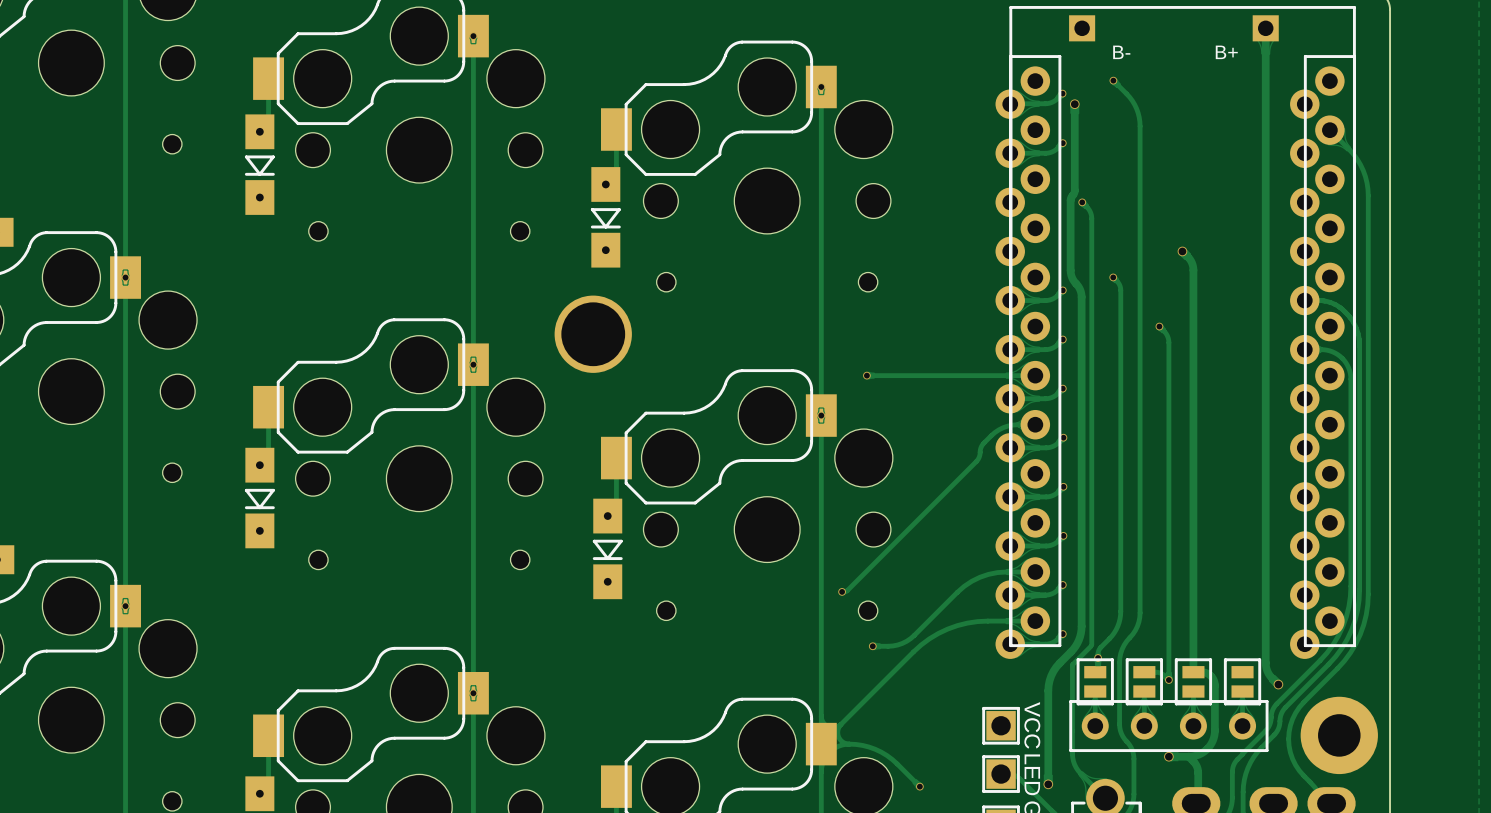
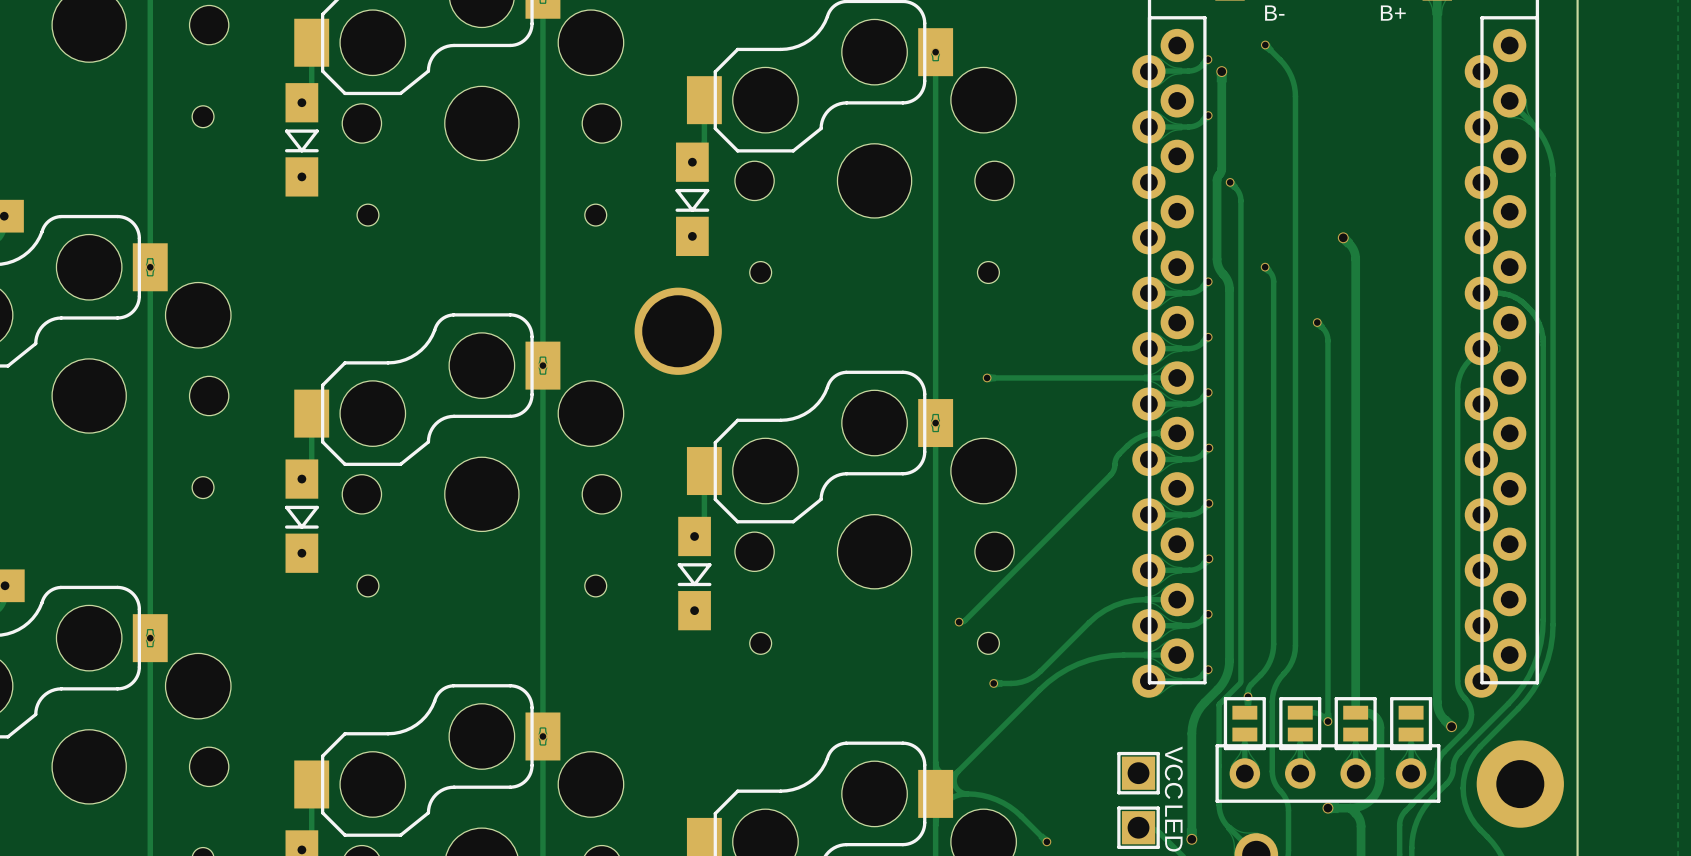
track: (1304, 349) (1324, 349) (1335, 353) (1345, 362) (1350, 373) (1350, 596) (1346, 616) (1333, 644) (1275, 705) (1268, 726) (1259, 737) -> (1481, 348) (1463, 368) (1457, 389) (1457, 681) (1460, 692) (1469, 705) (1471, 716) (1466, 729) (1440, 756) (1436, 775) (1430, 786)

